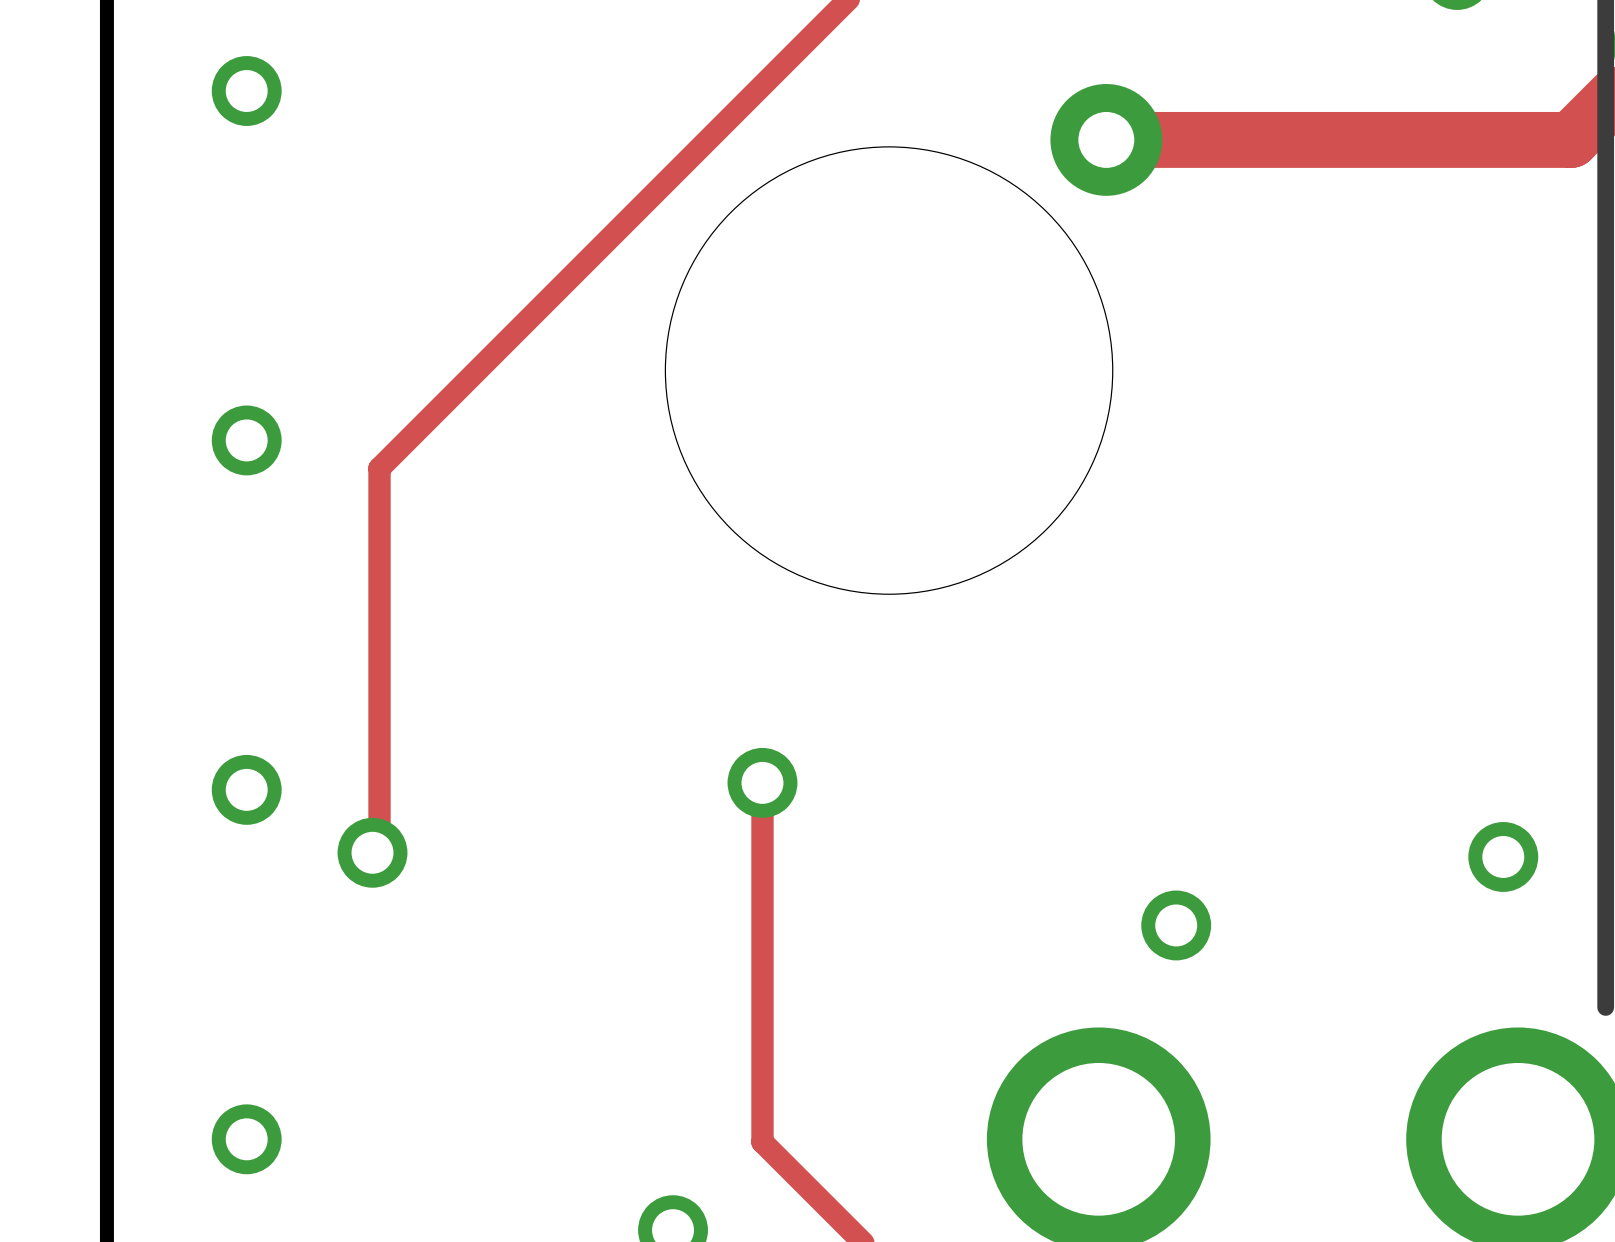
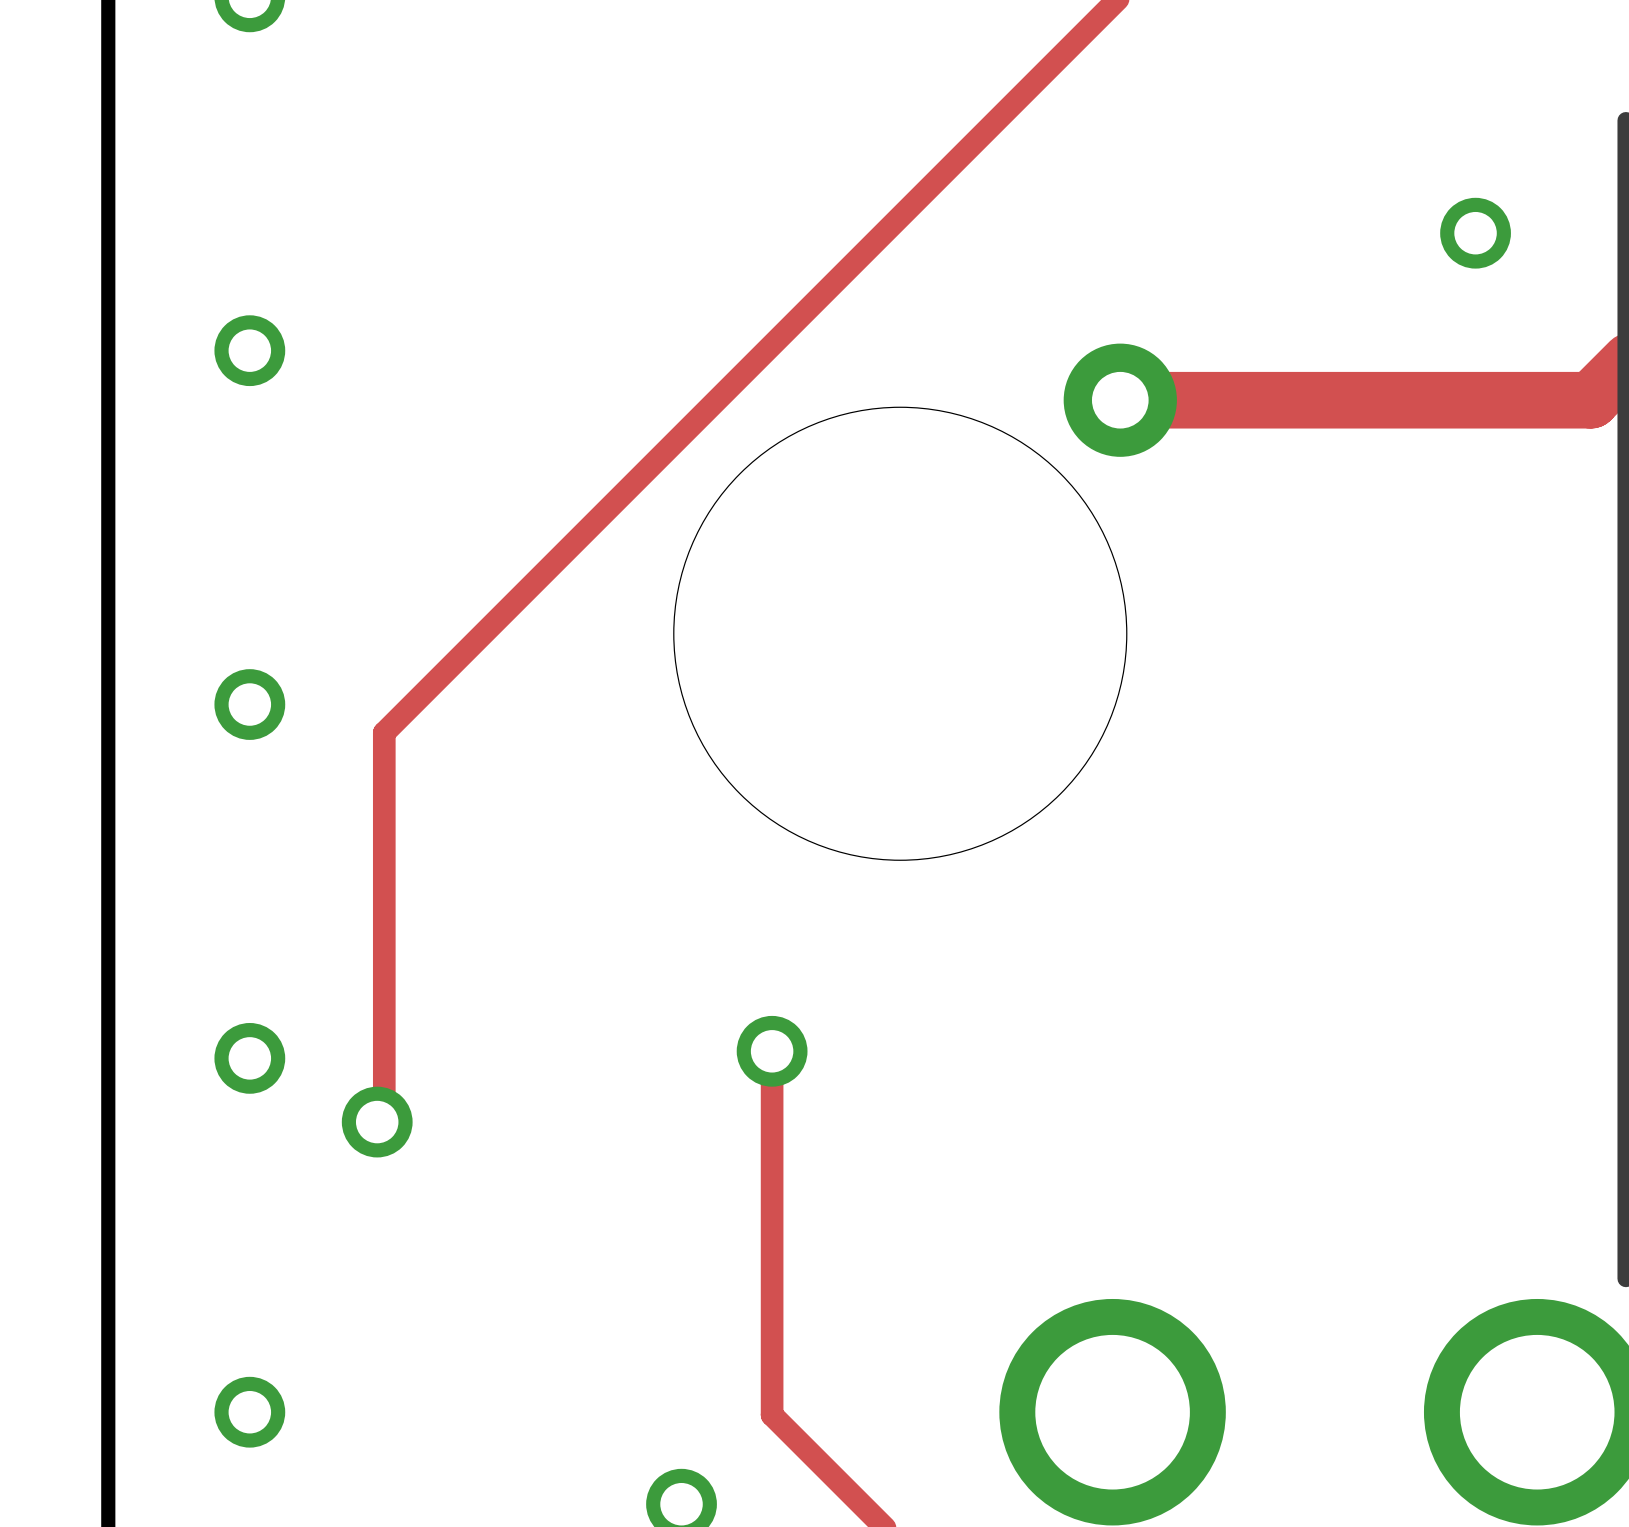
via: (1503, 856) -> none
via: (1176, 925) -> none

